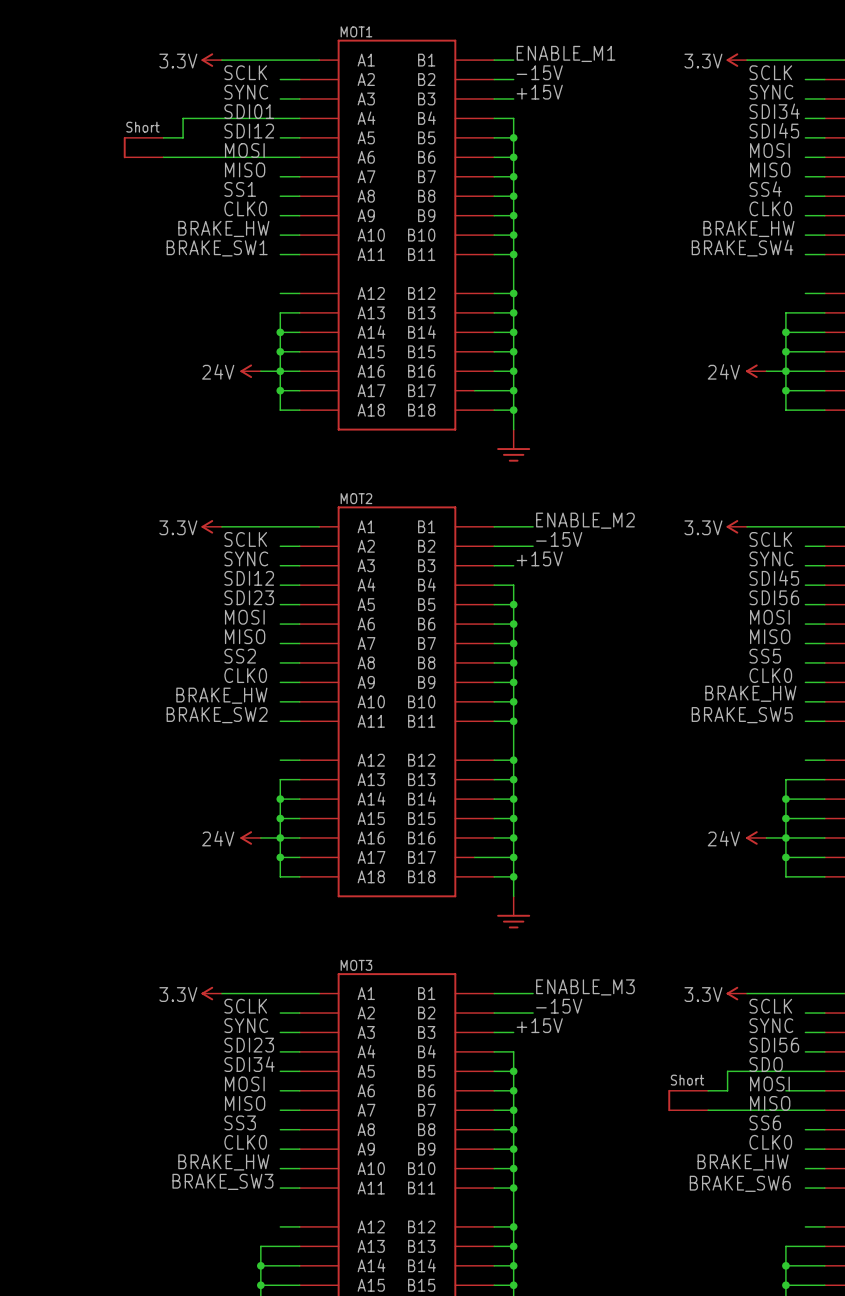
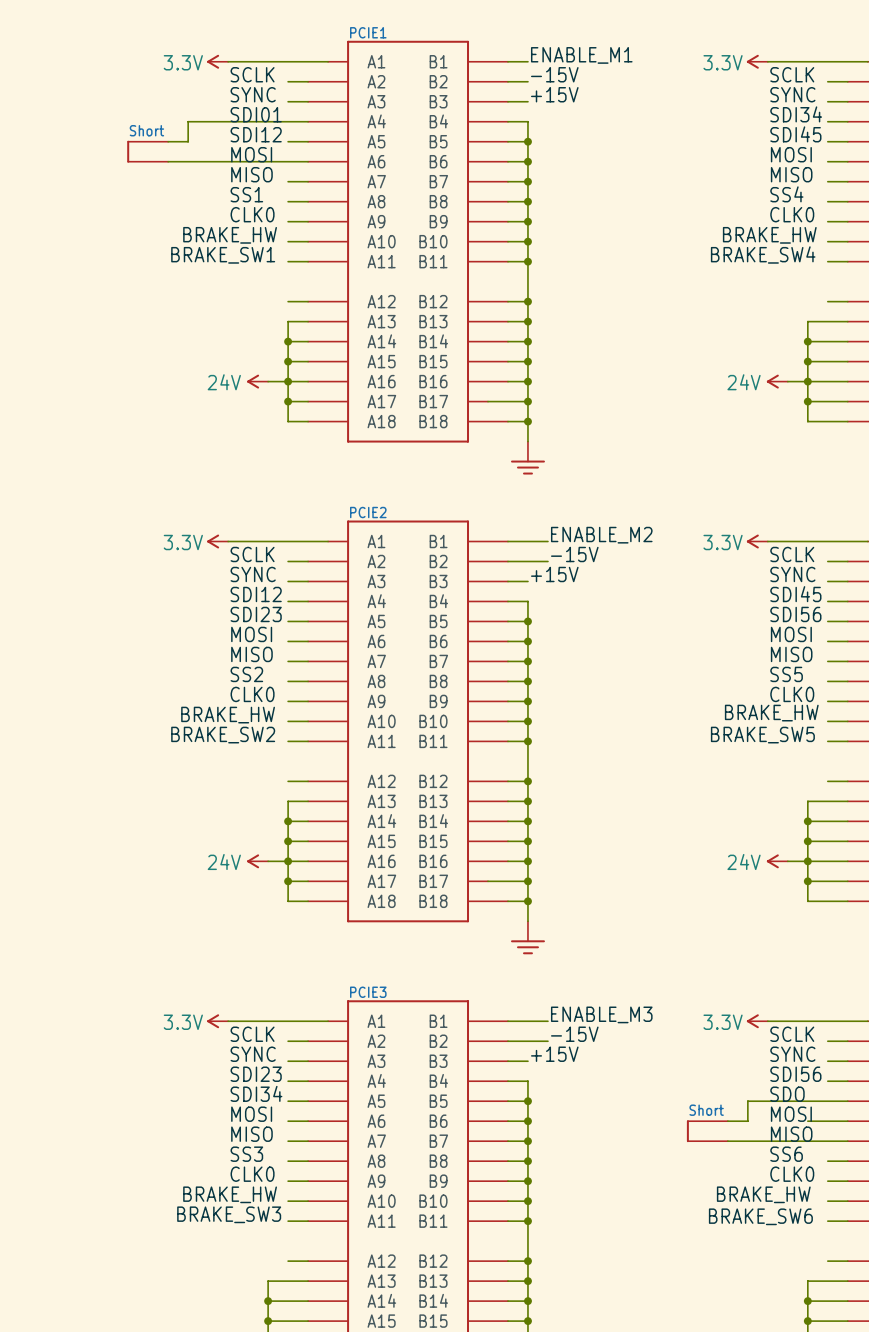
MOT1 name: MOT1 (356, 31) -> PCIE1 (368, 32)
MOT2 name: MOT2 (356, 498) -> PCIE2 (368, 512)
MOT3 name: MOT3 (356, 965) -> PCIE3 (368, 992)

